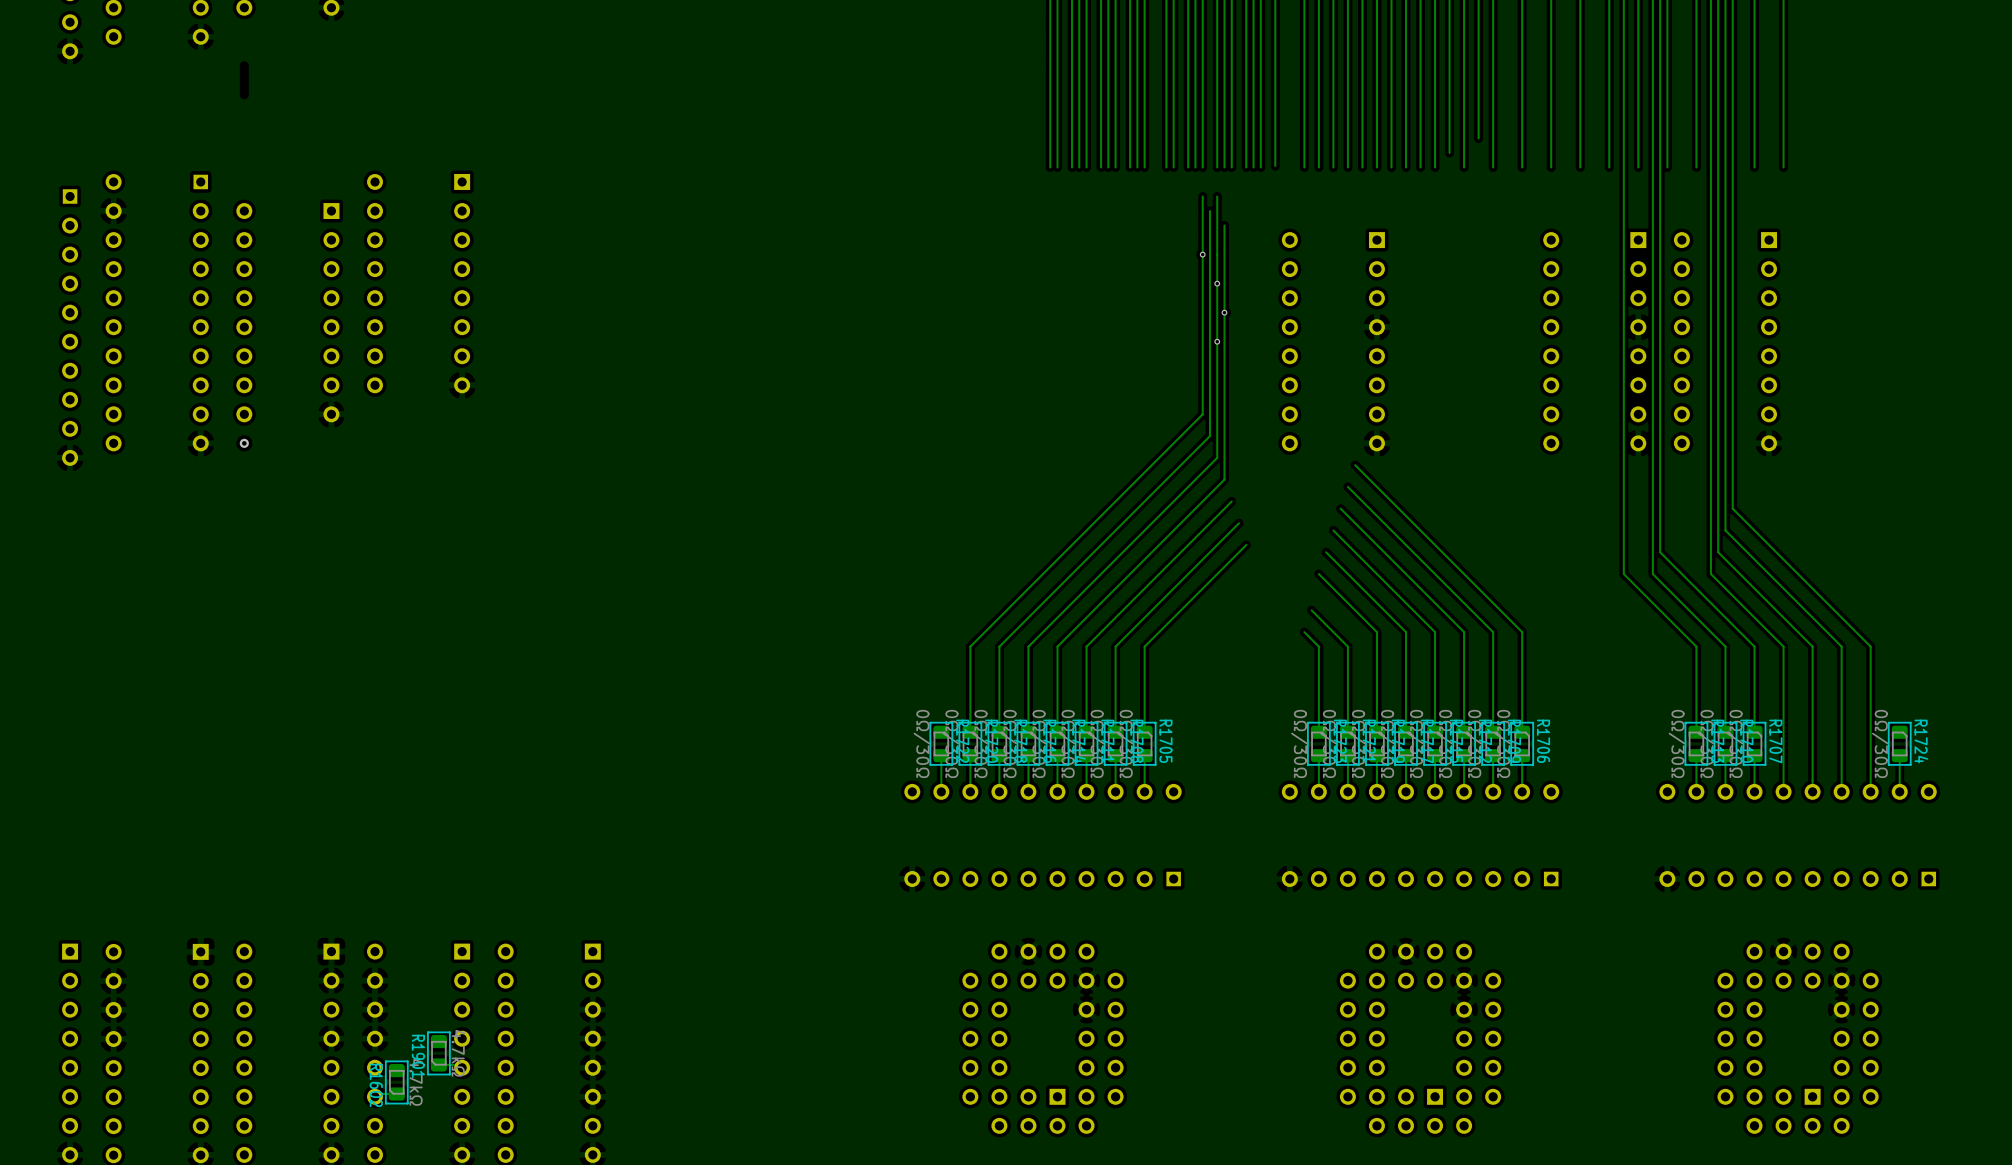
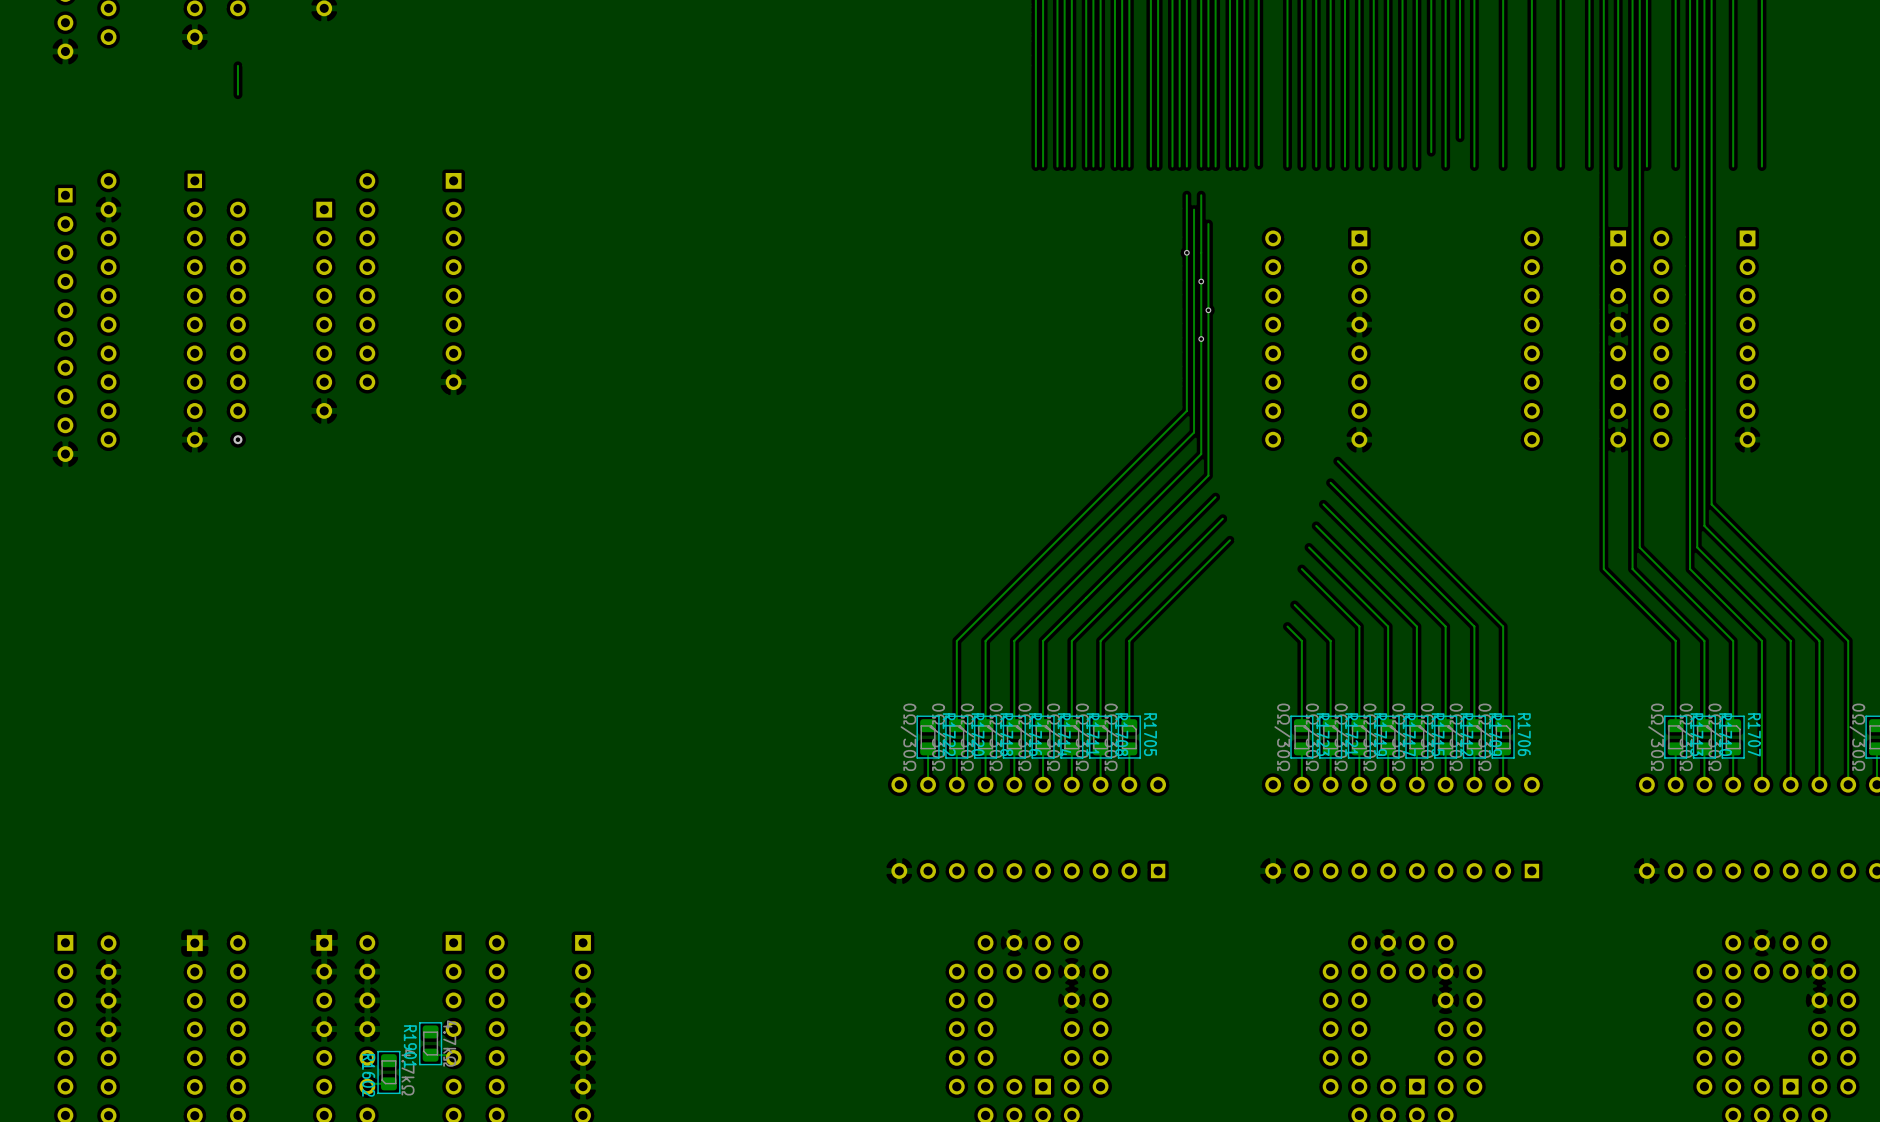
track: none -> (237, 65) (237, 94)

